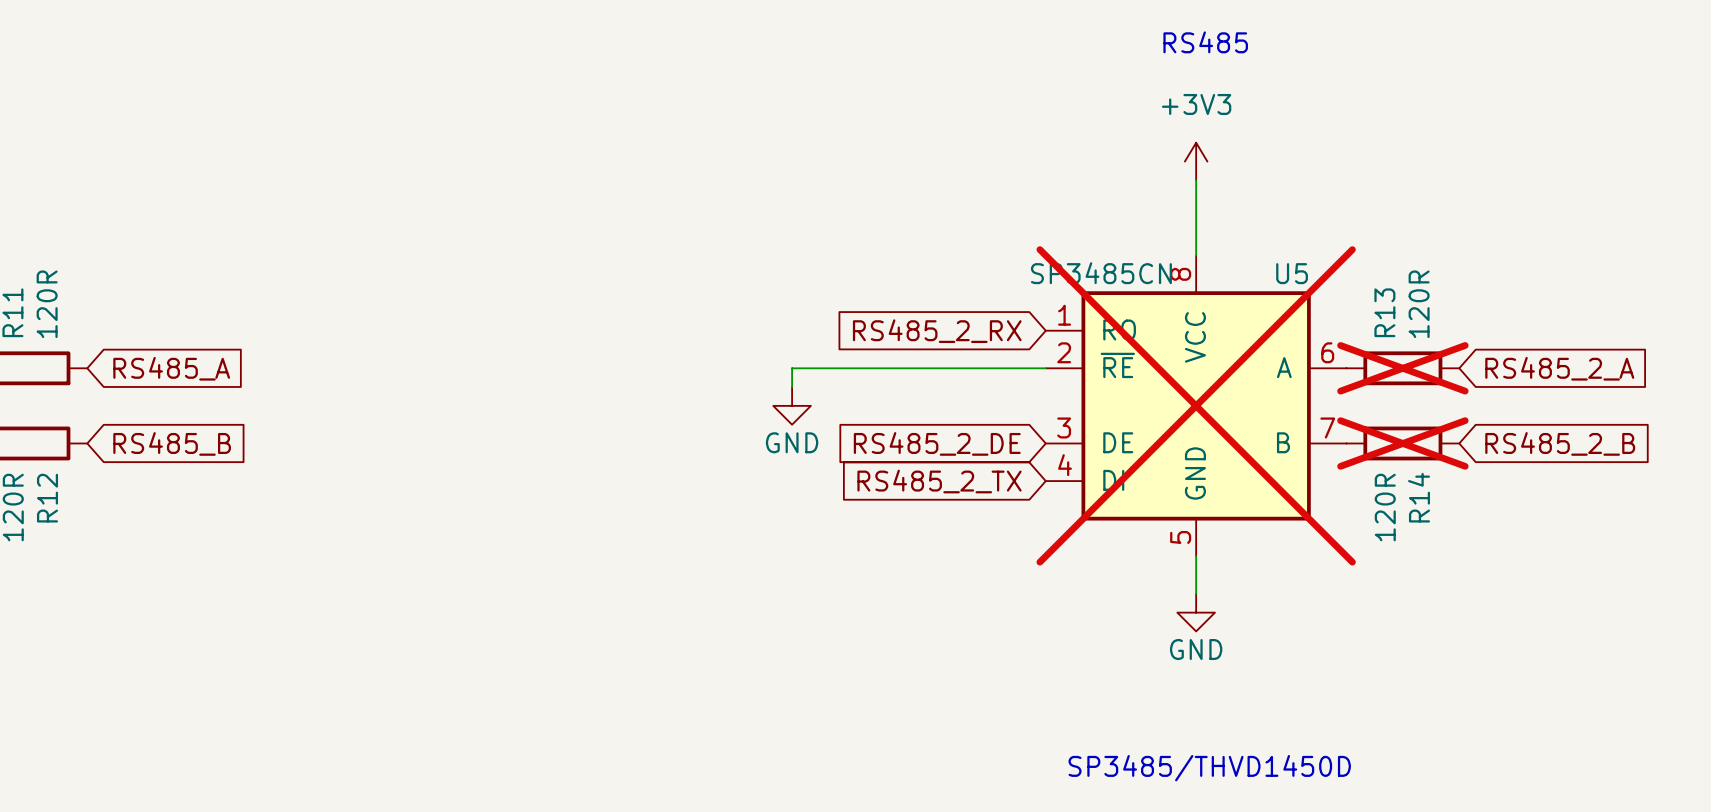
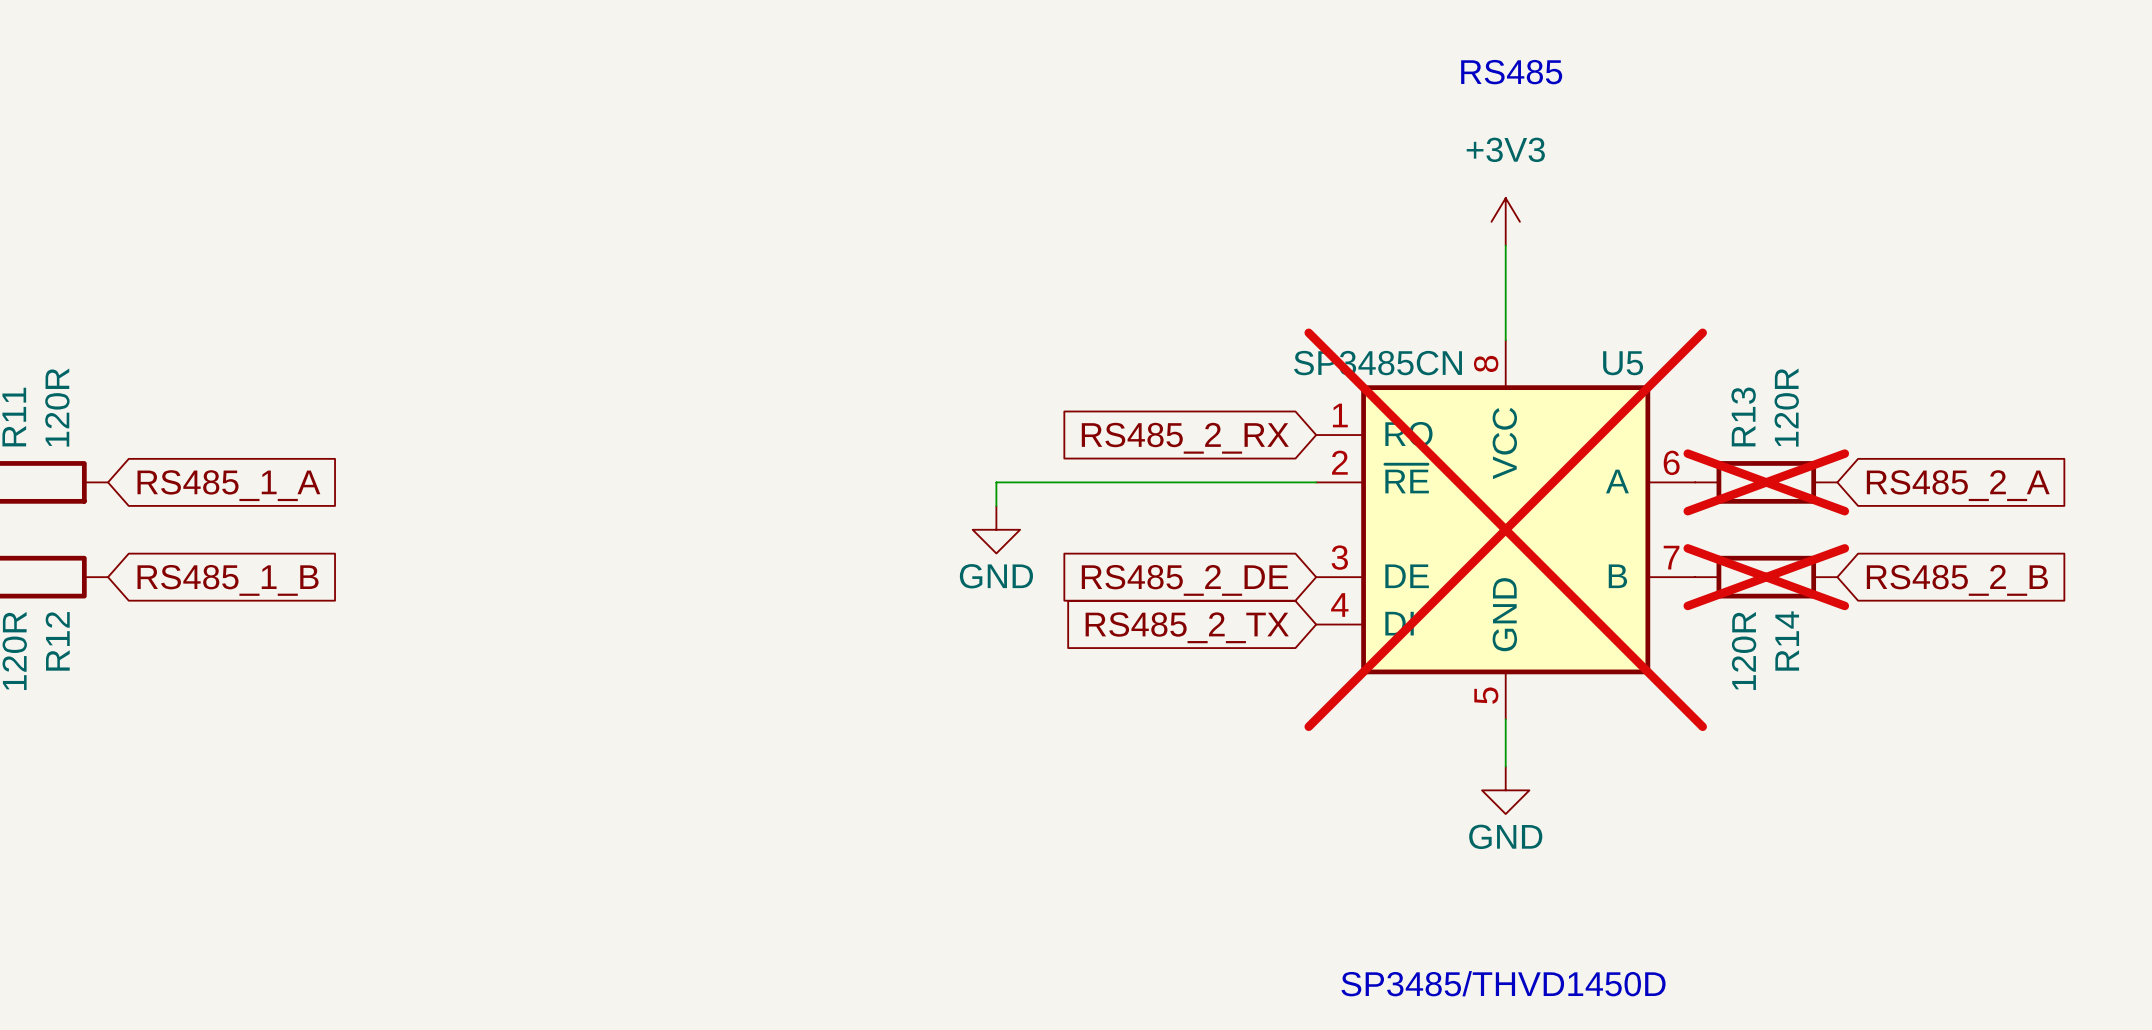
global label: RS485_A (171, 368) -> RS485_1_A (228, 485)
global label: RS485_B (172, 443) -> RS485_1_B (228, 580)

